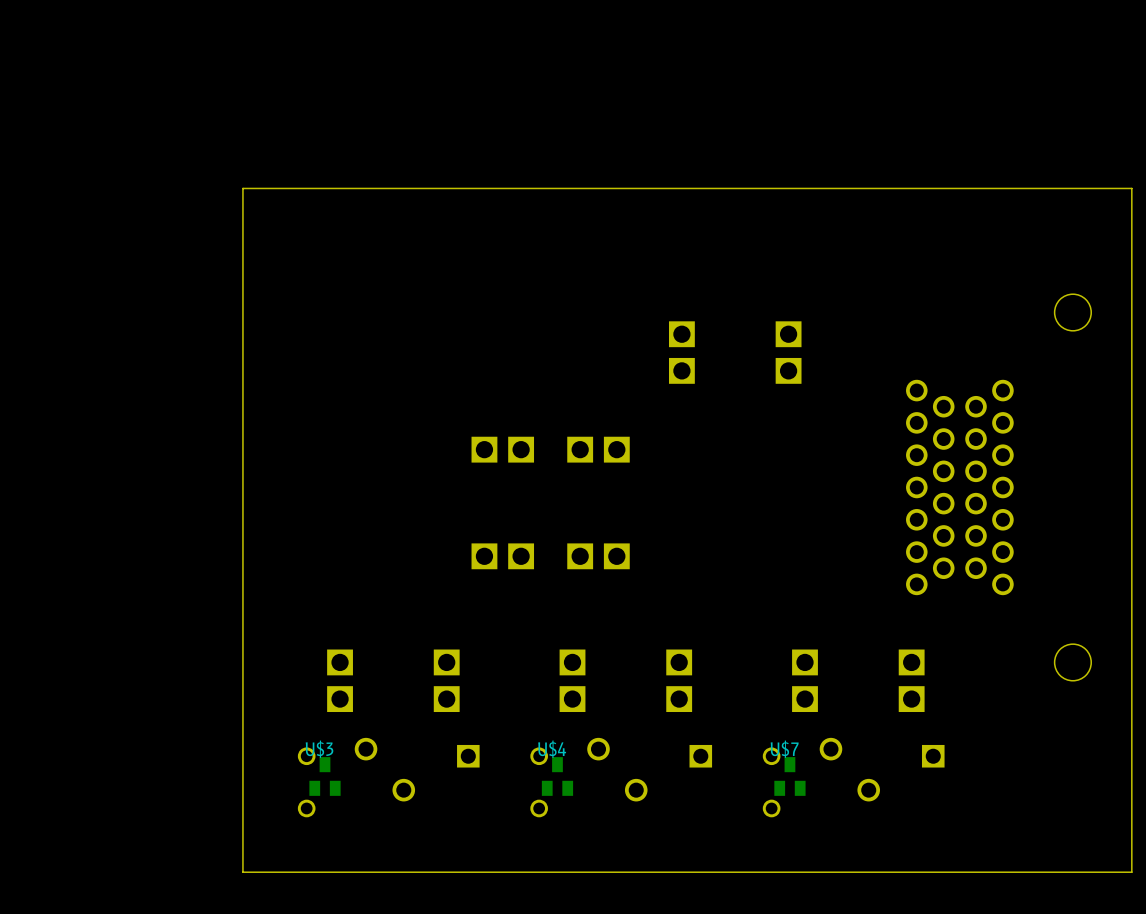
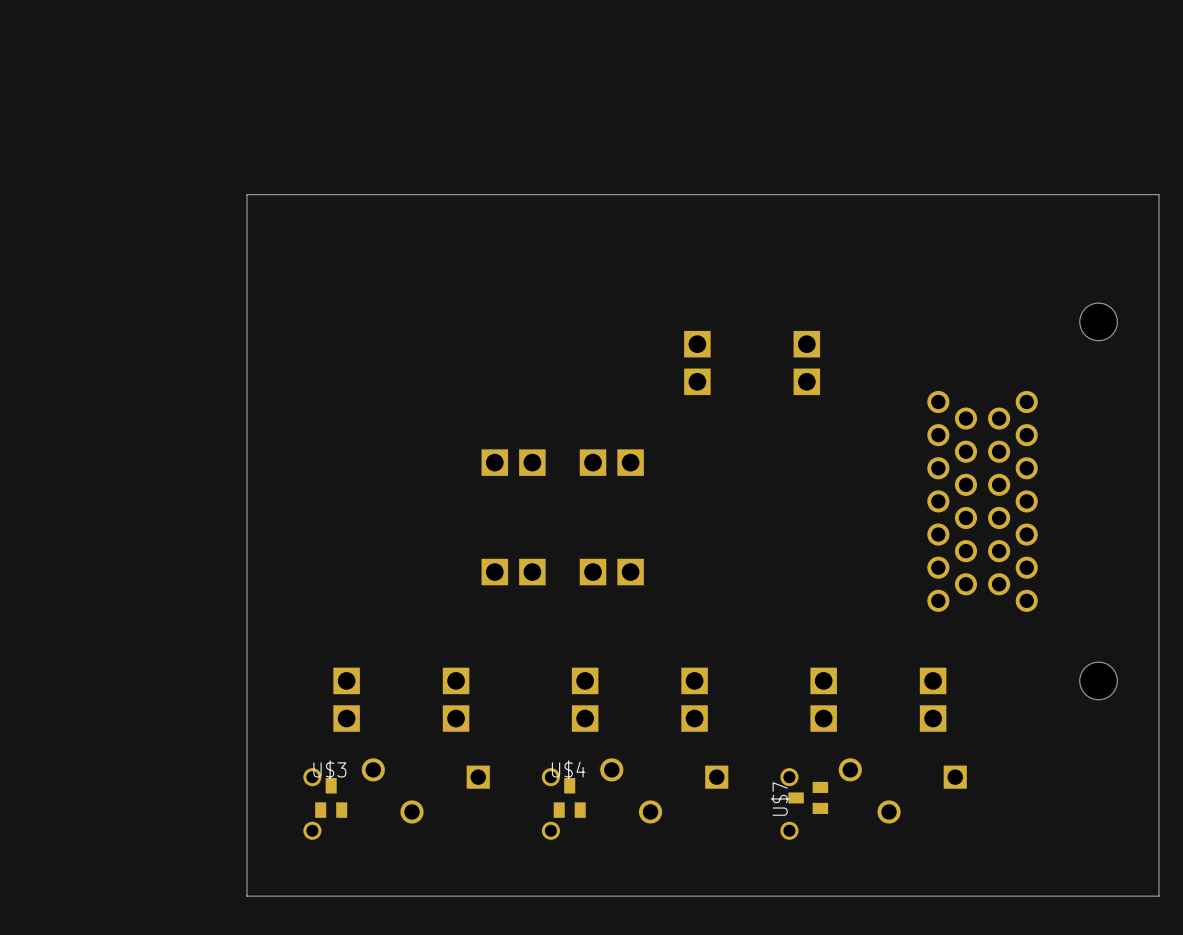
U$7 rotation: 0° (789, 776) -> 90° counterclockwise (808, 797)

